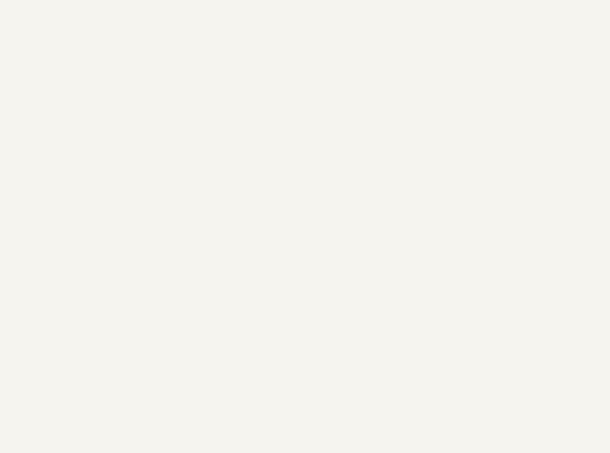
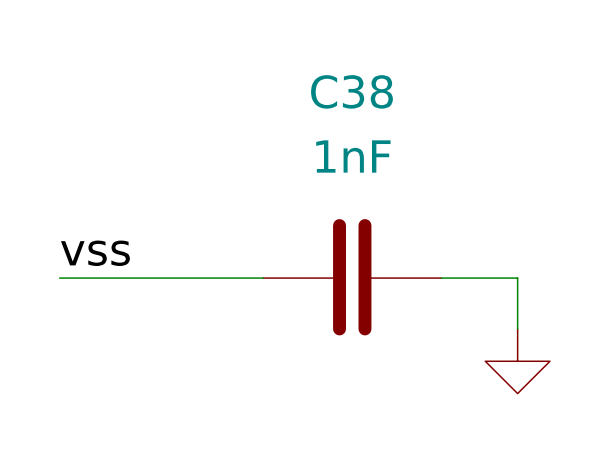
label: none -> vss (95, 253)
C38: none -> 1nF (352, 277)
wire: none -> (59, 278) (263, 278)
wire: none -> (441, 278) (517, 278) (517, 328)
power symbol: none -> (517, 361)

